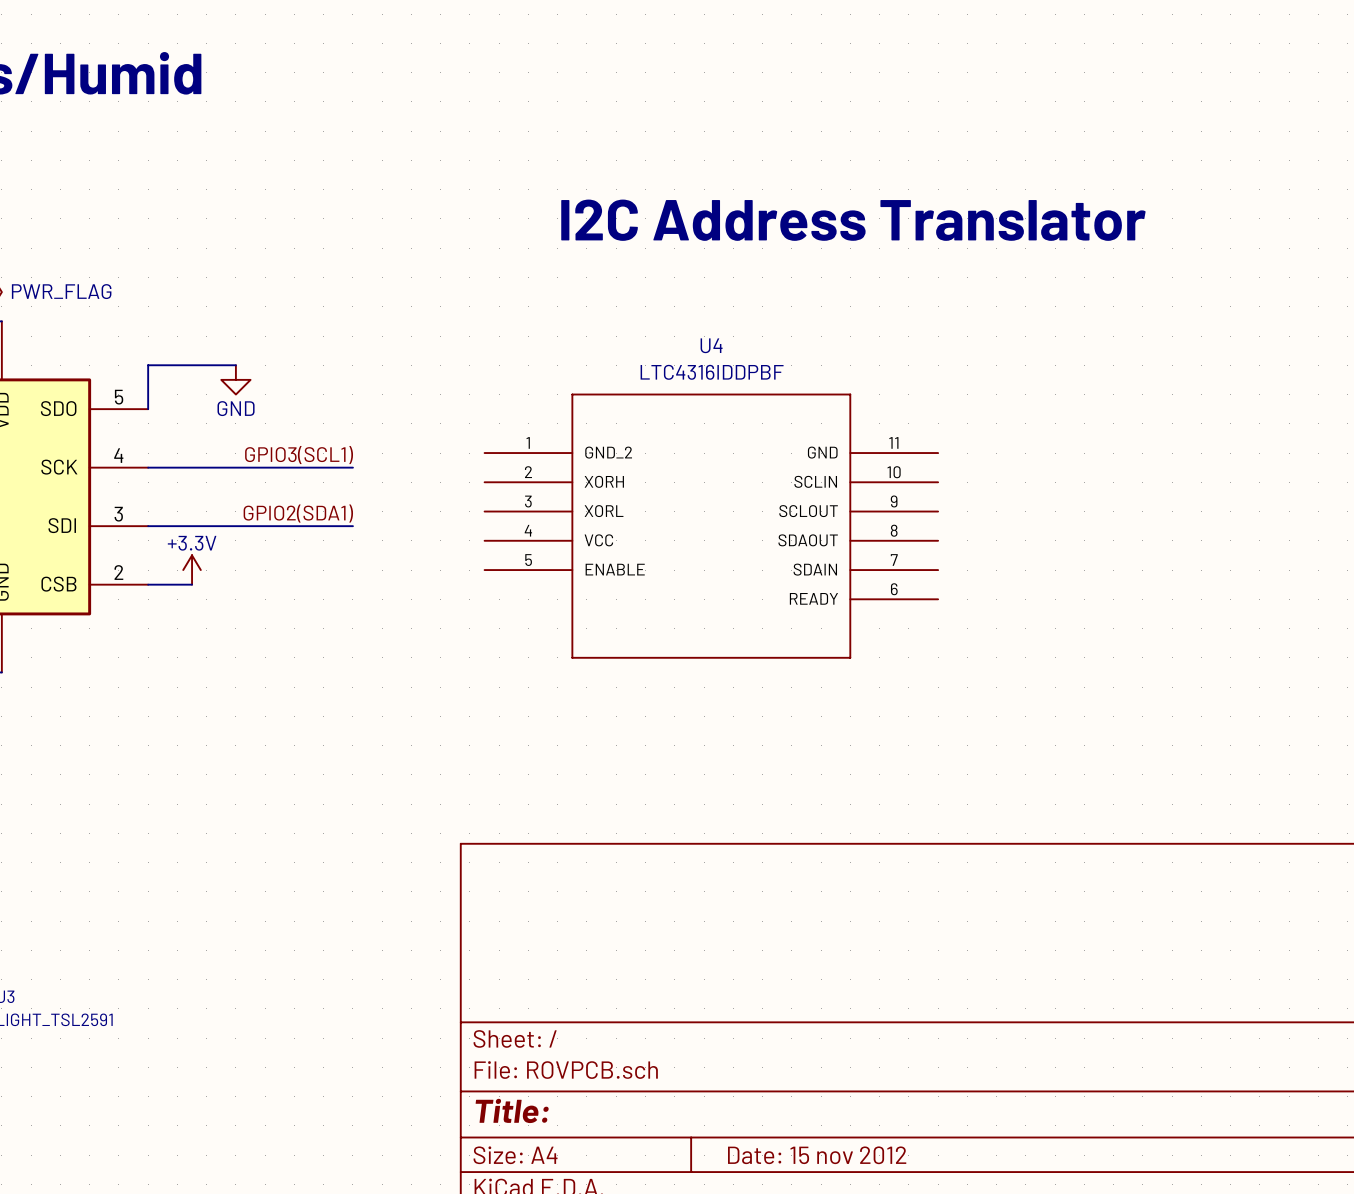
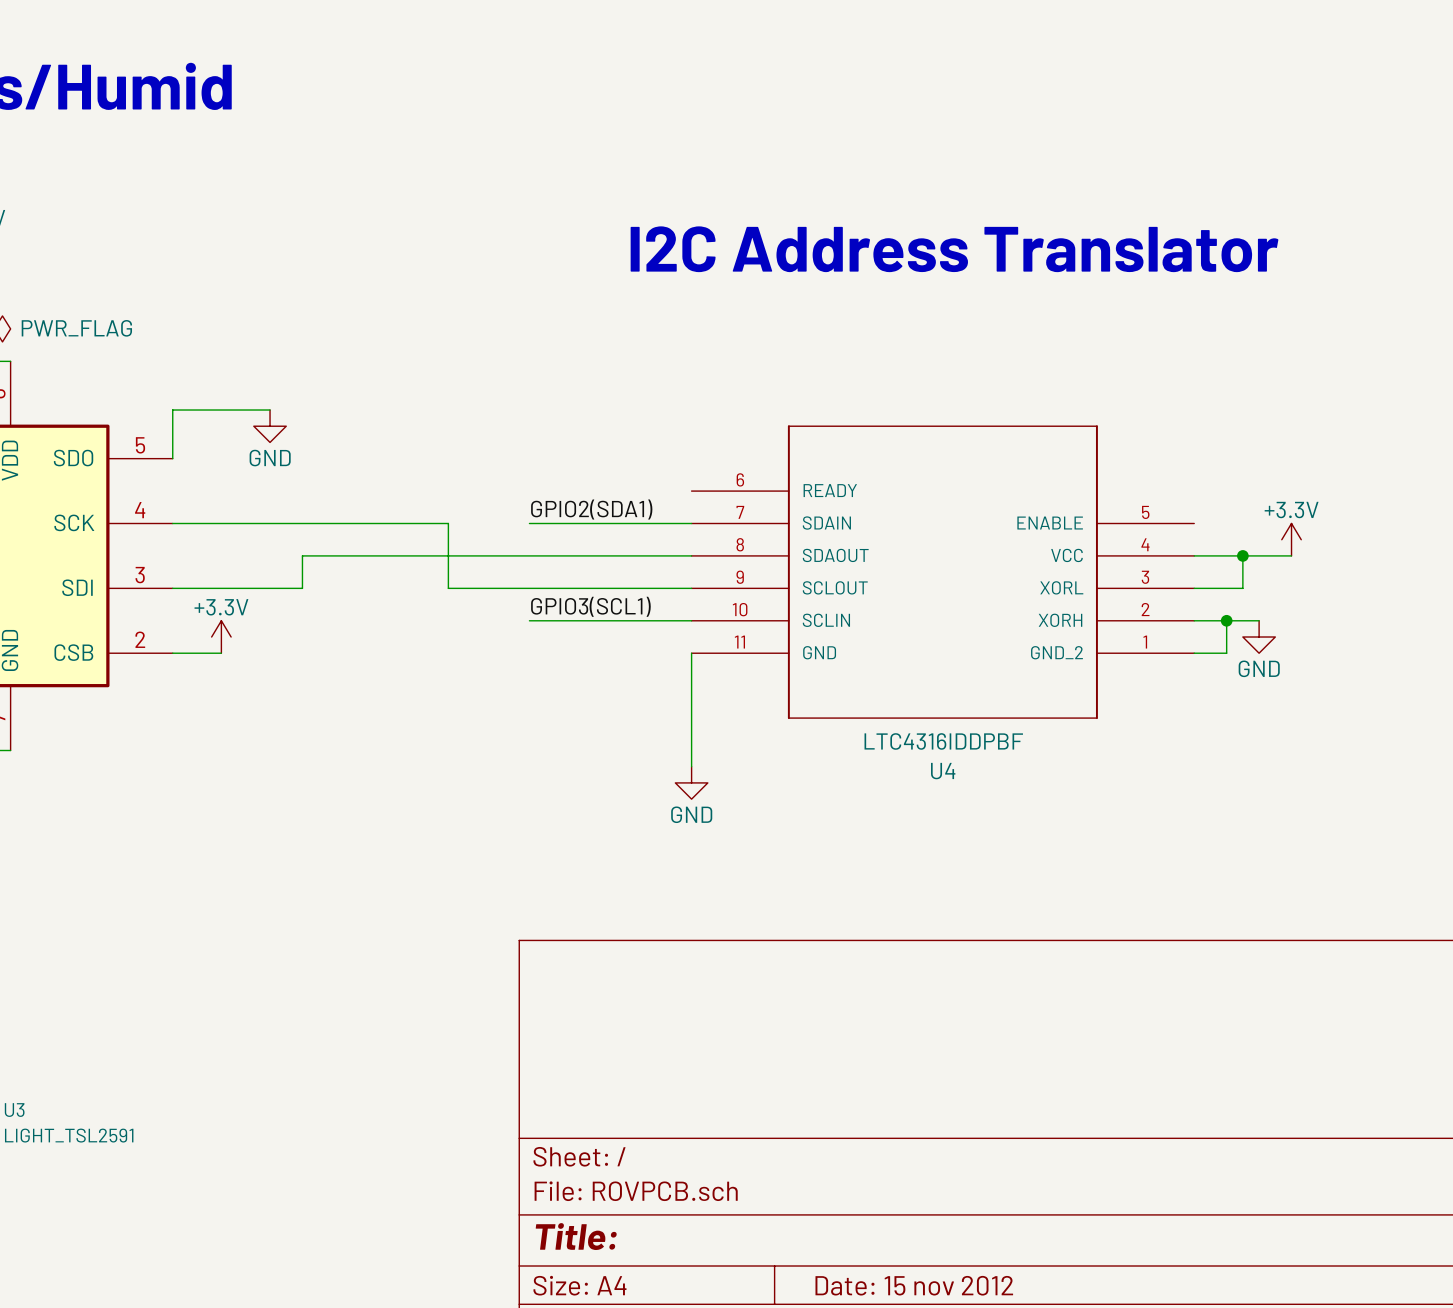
label position: GPIO3(SCL1) (299, 455) -> GPIO3(SCL1) (590, 606)
wire: none -> (399, 523) (448, 523) (448, 588) (691, 588)
wire: none -> (529, 523) (691, 523)
power symbol: none -> +3.3V (1291, 539)
wire: none -> (1194, 555) (1291, 555)
wire: none -> (1242, 555) (1242, 588) (1194, 588)
junction: none -> (1242, 555)
label position: GPIO2(SDA1) (298, 513) -> GPIO2(SDA1) (591, 509)
wire: (265, 526) (352, 526) -> (302, 588) (302, 555) (691, 555)
U4 rotation: 0° (711, 526) -> 180° (942, 572)
wire: none -> (529, 620) (691, 620)
wire: none -> (1194, 620) (1259, 620)
wire: none -> (1226, 620) (1226, 653) (1194, 653)
junction: none -> (1226, 620)
power symbol: none -> GND (1259, 637)
wire: none -> (691, 653) (691, 766)
power symbol: none -> GND (691, 782)

